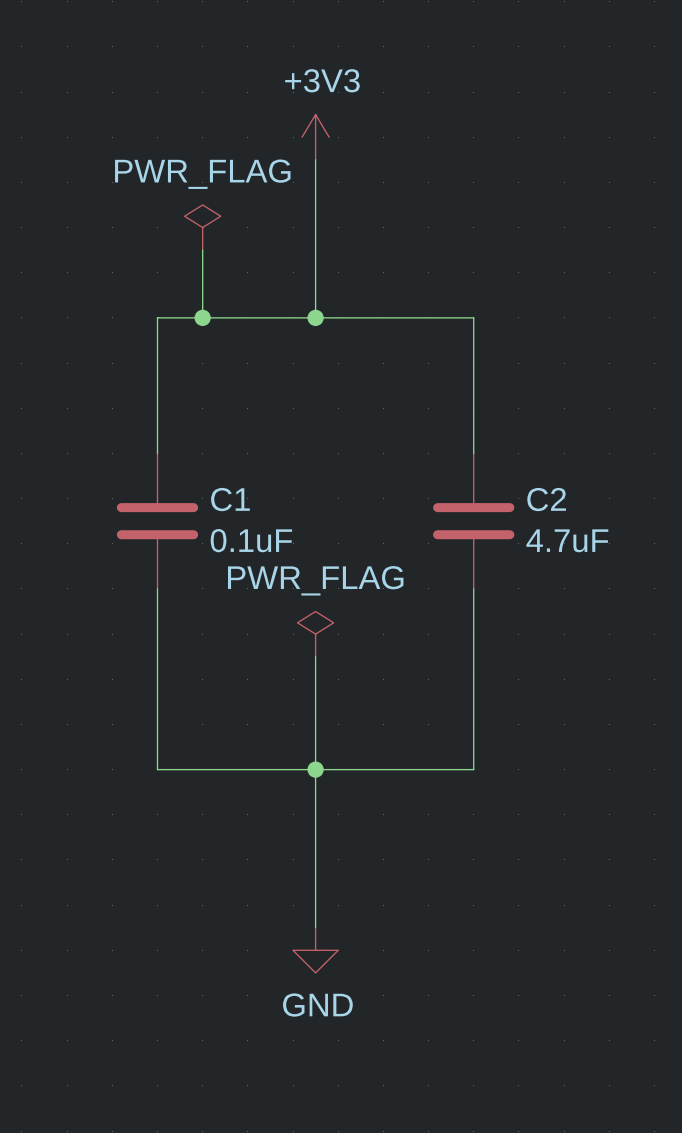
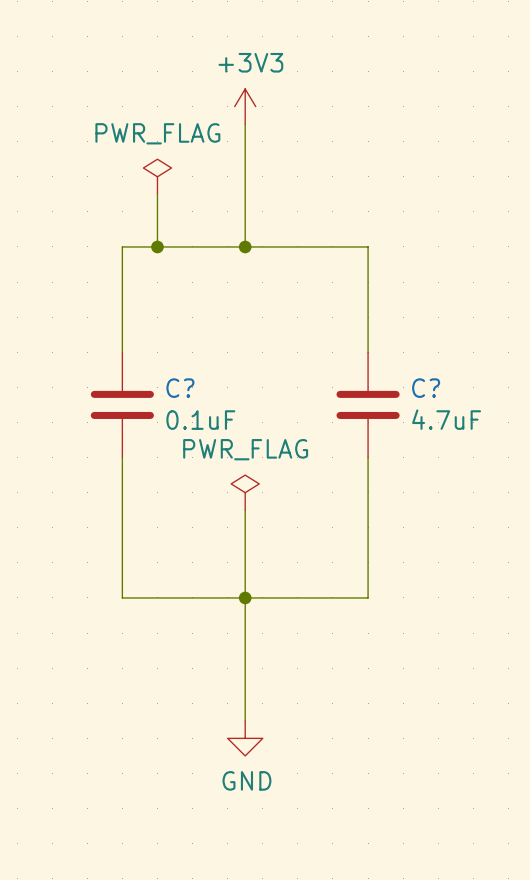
C1 name: C1 (230, 499) -> C? (180, 388)
C2 name: C2 (546, 499) -> C? (426, 388)

